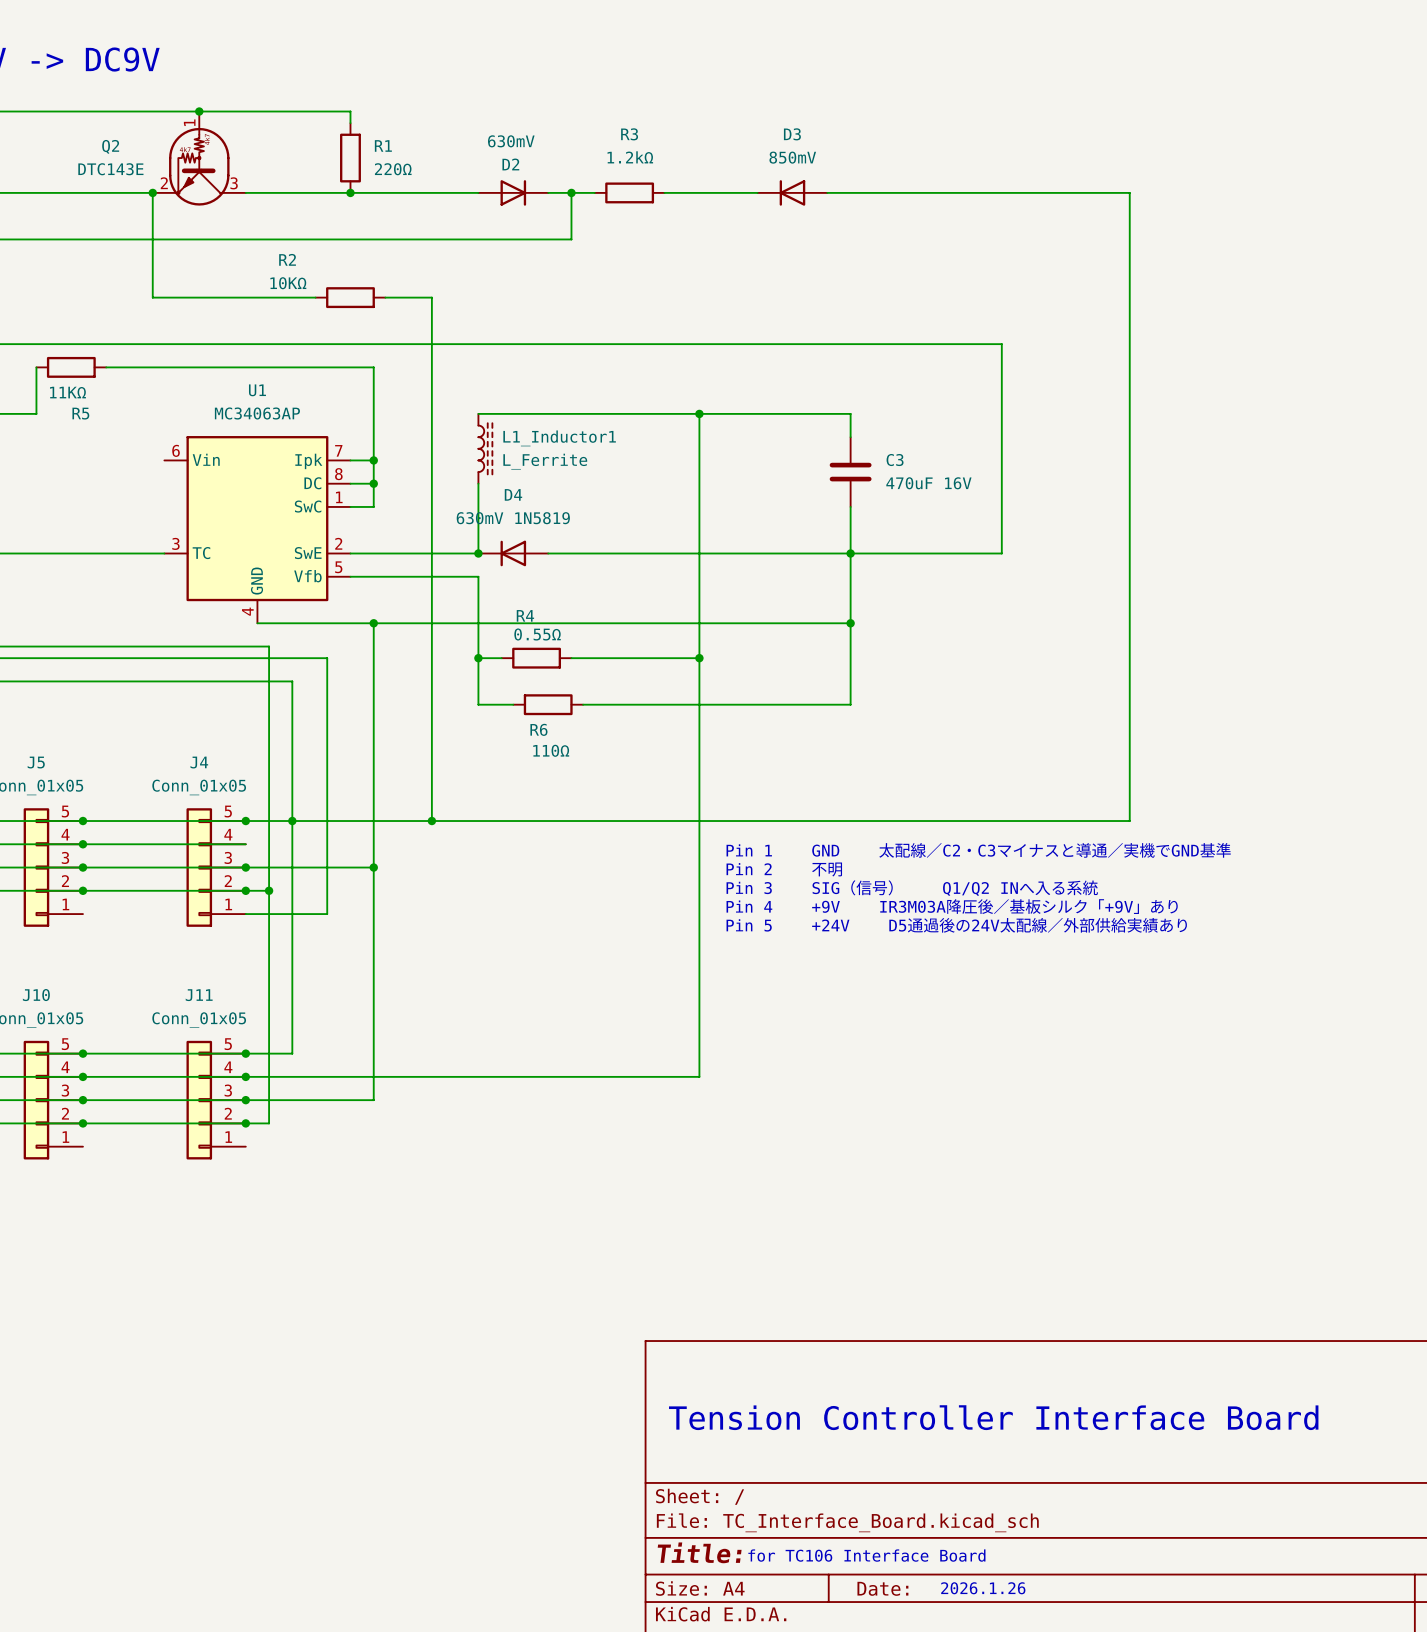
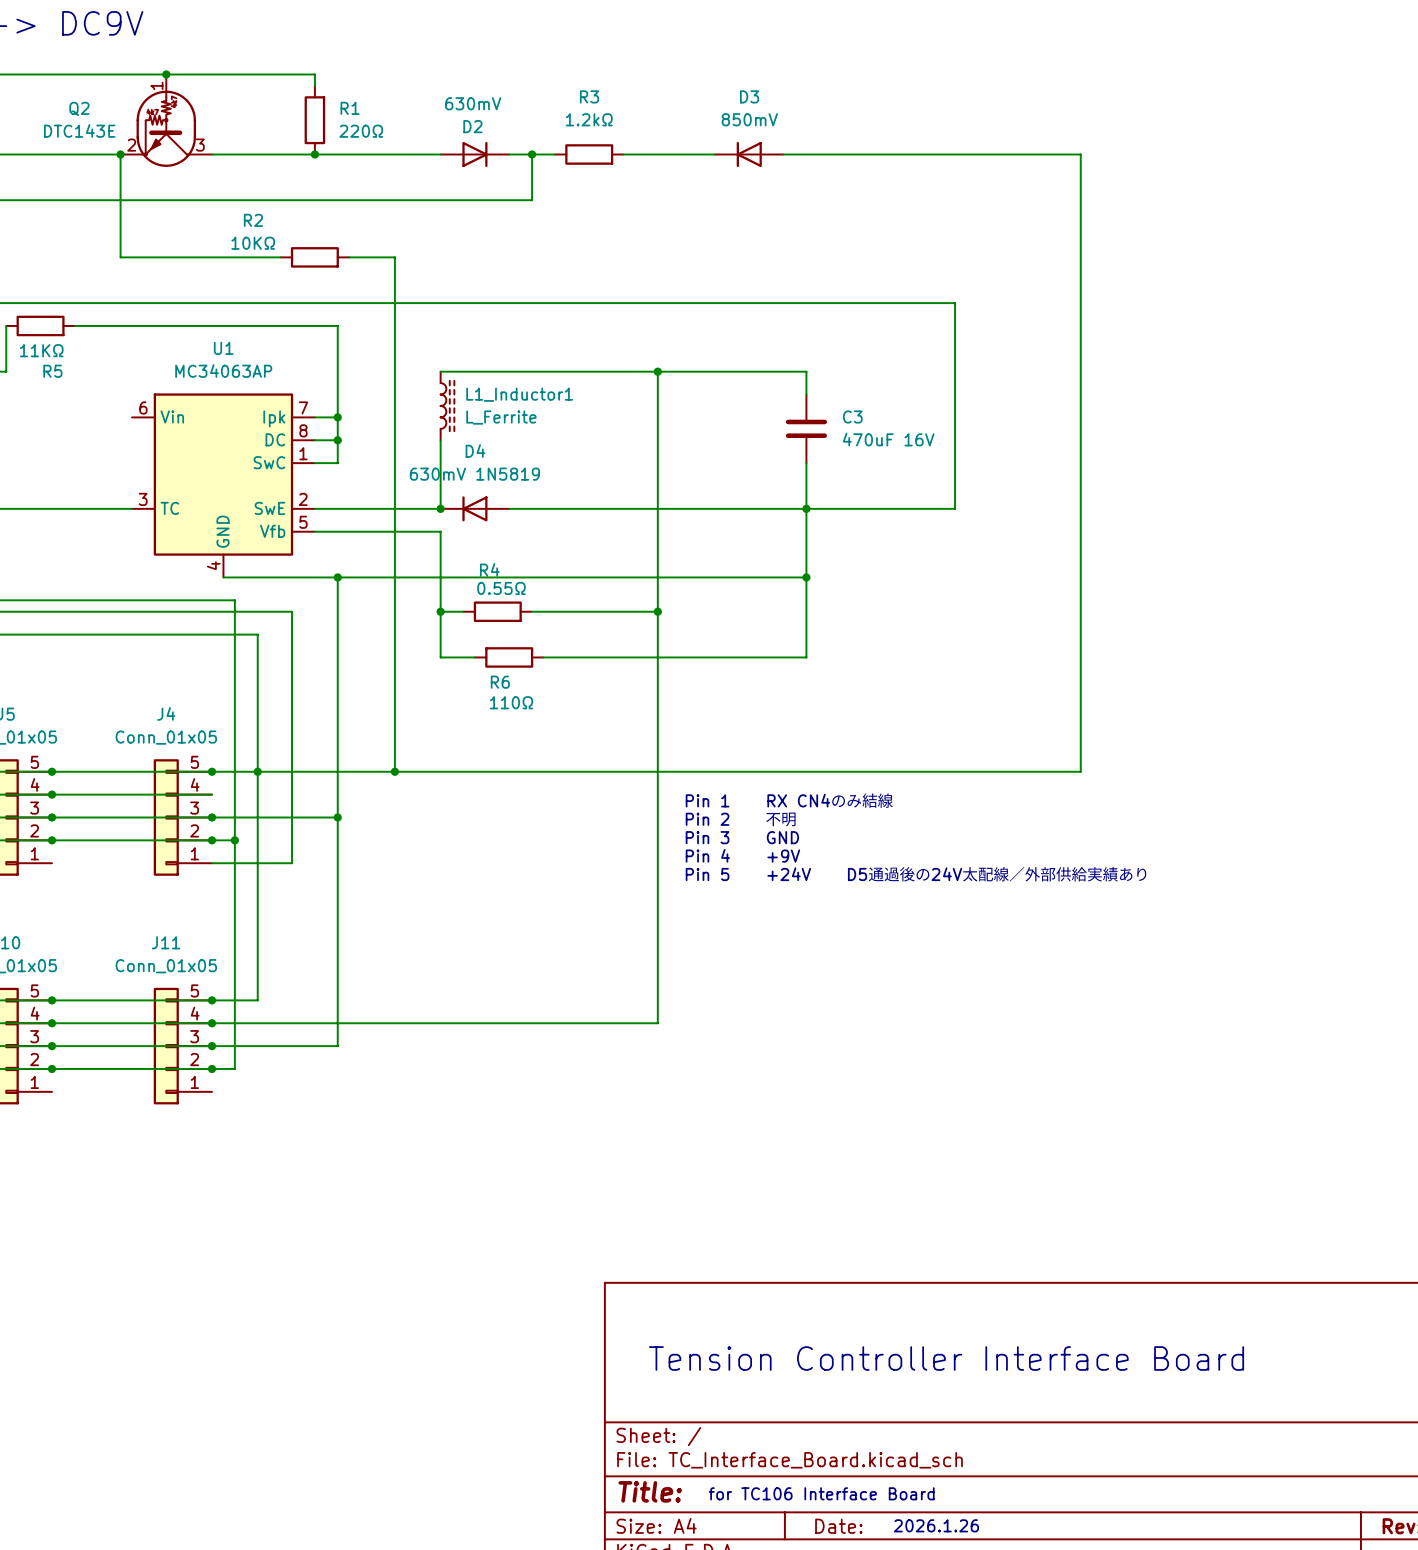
text: Pin 1 GND 太配線／C2・C3マイナスと導通／実機でGND基準 (978, 850) -> Pin 1 RX CN4のみ結線 (789, 800)
text: Pin 3 SIG（信号） Q1/Q2 INへ入る系統 (912, 888) -> Pin 3 GND (742, 837)
text: Pin 4 +9V IR3M03A降圧後／基板シルク「+9V」あり (952, 906) -> Pin 4 +9V (742, 855)

